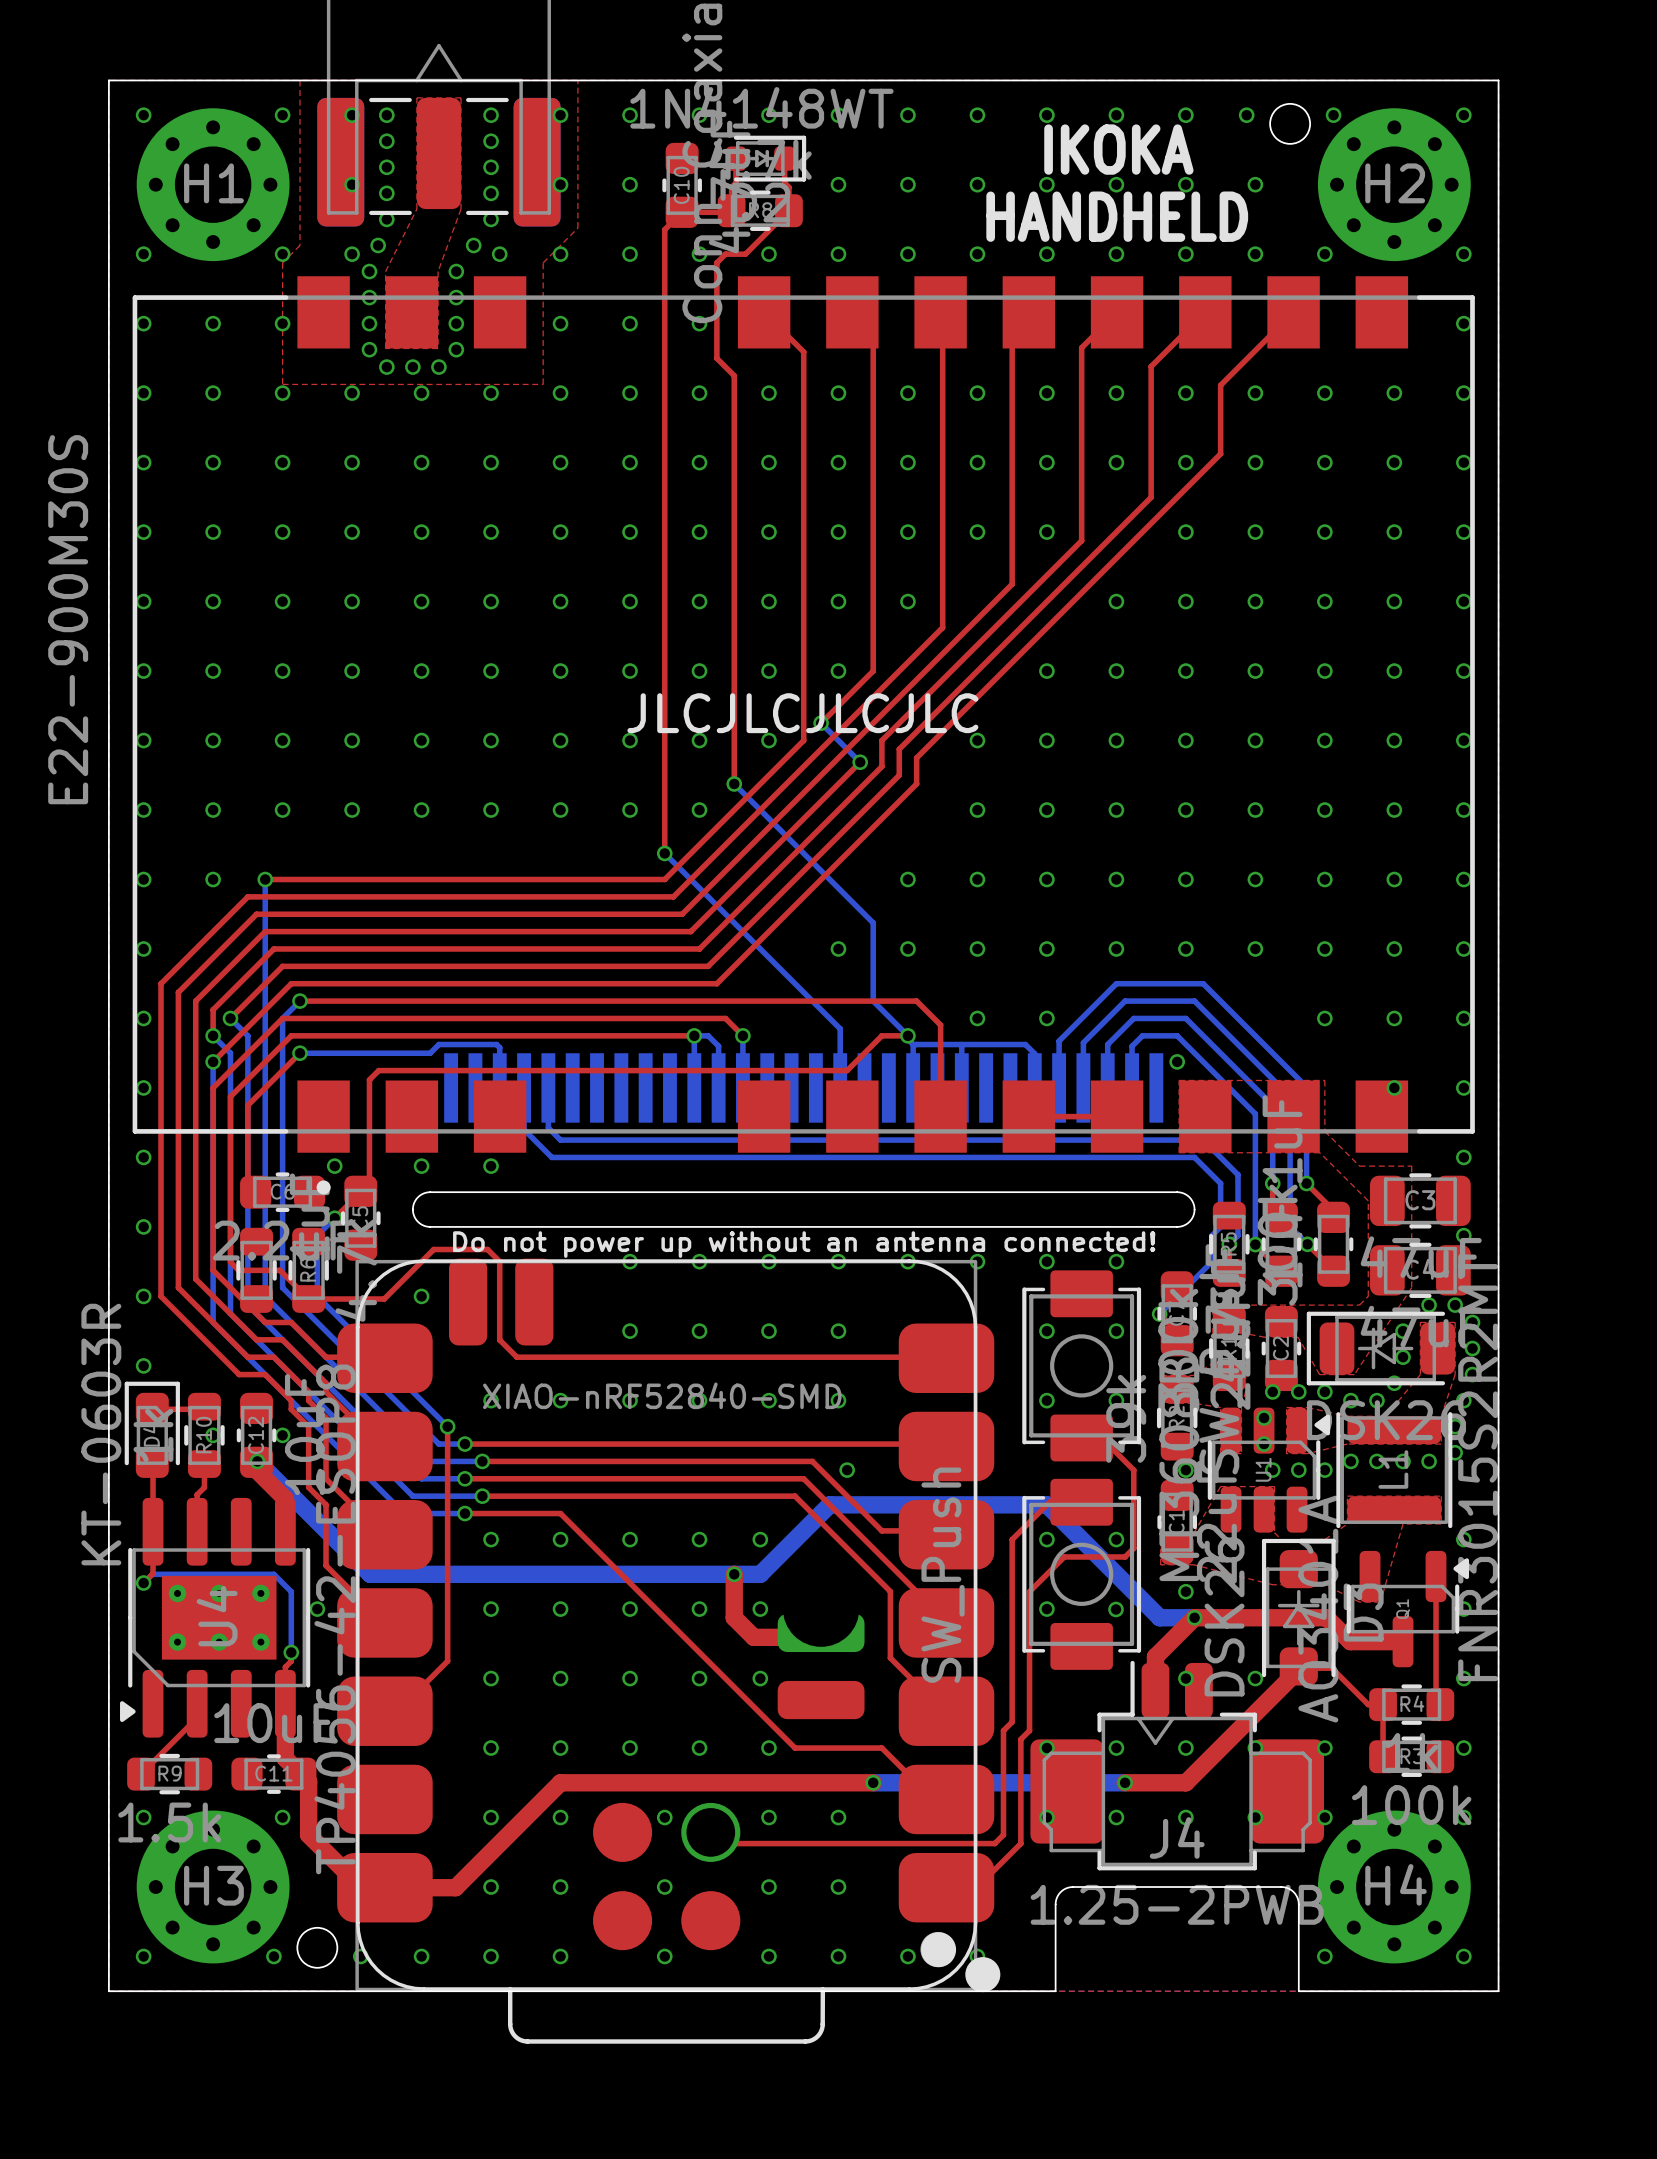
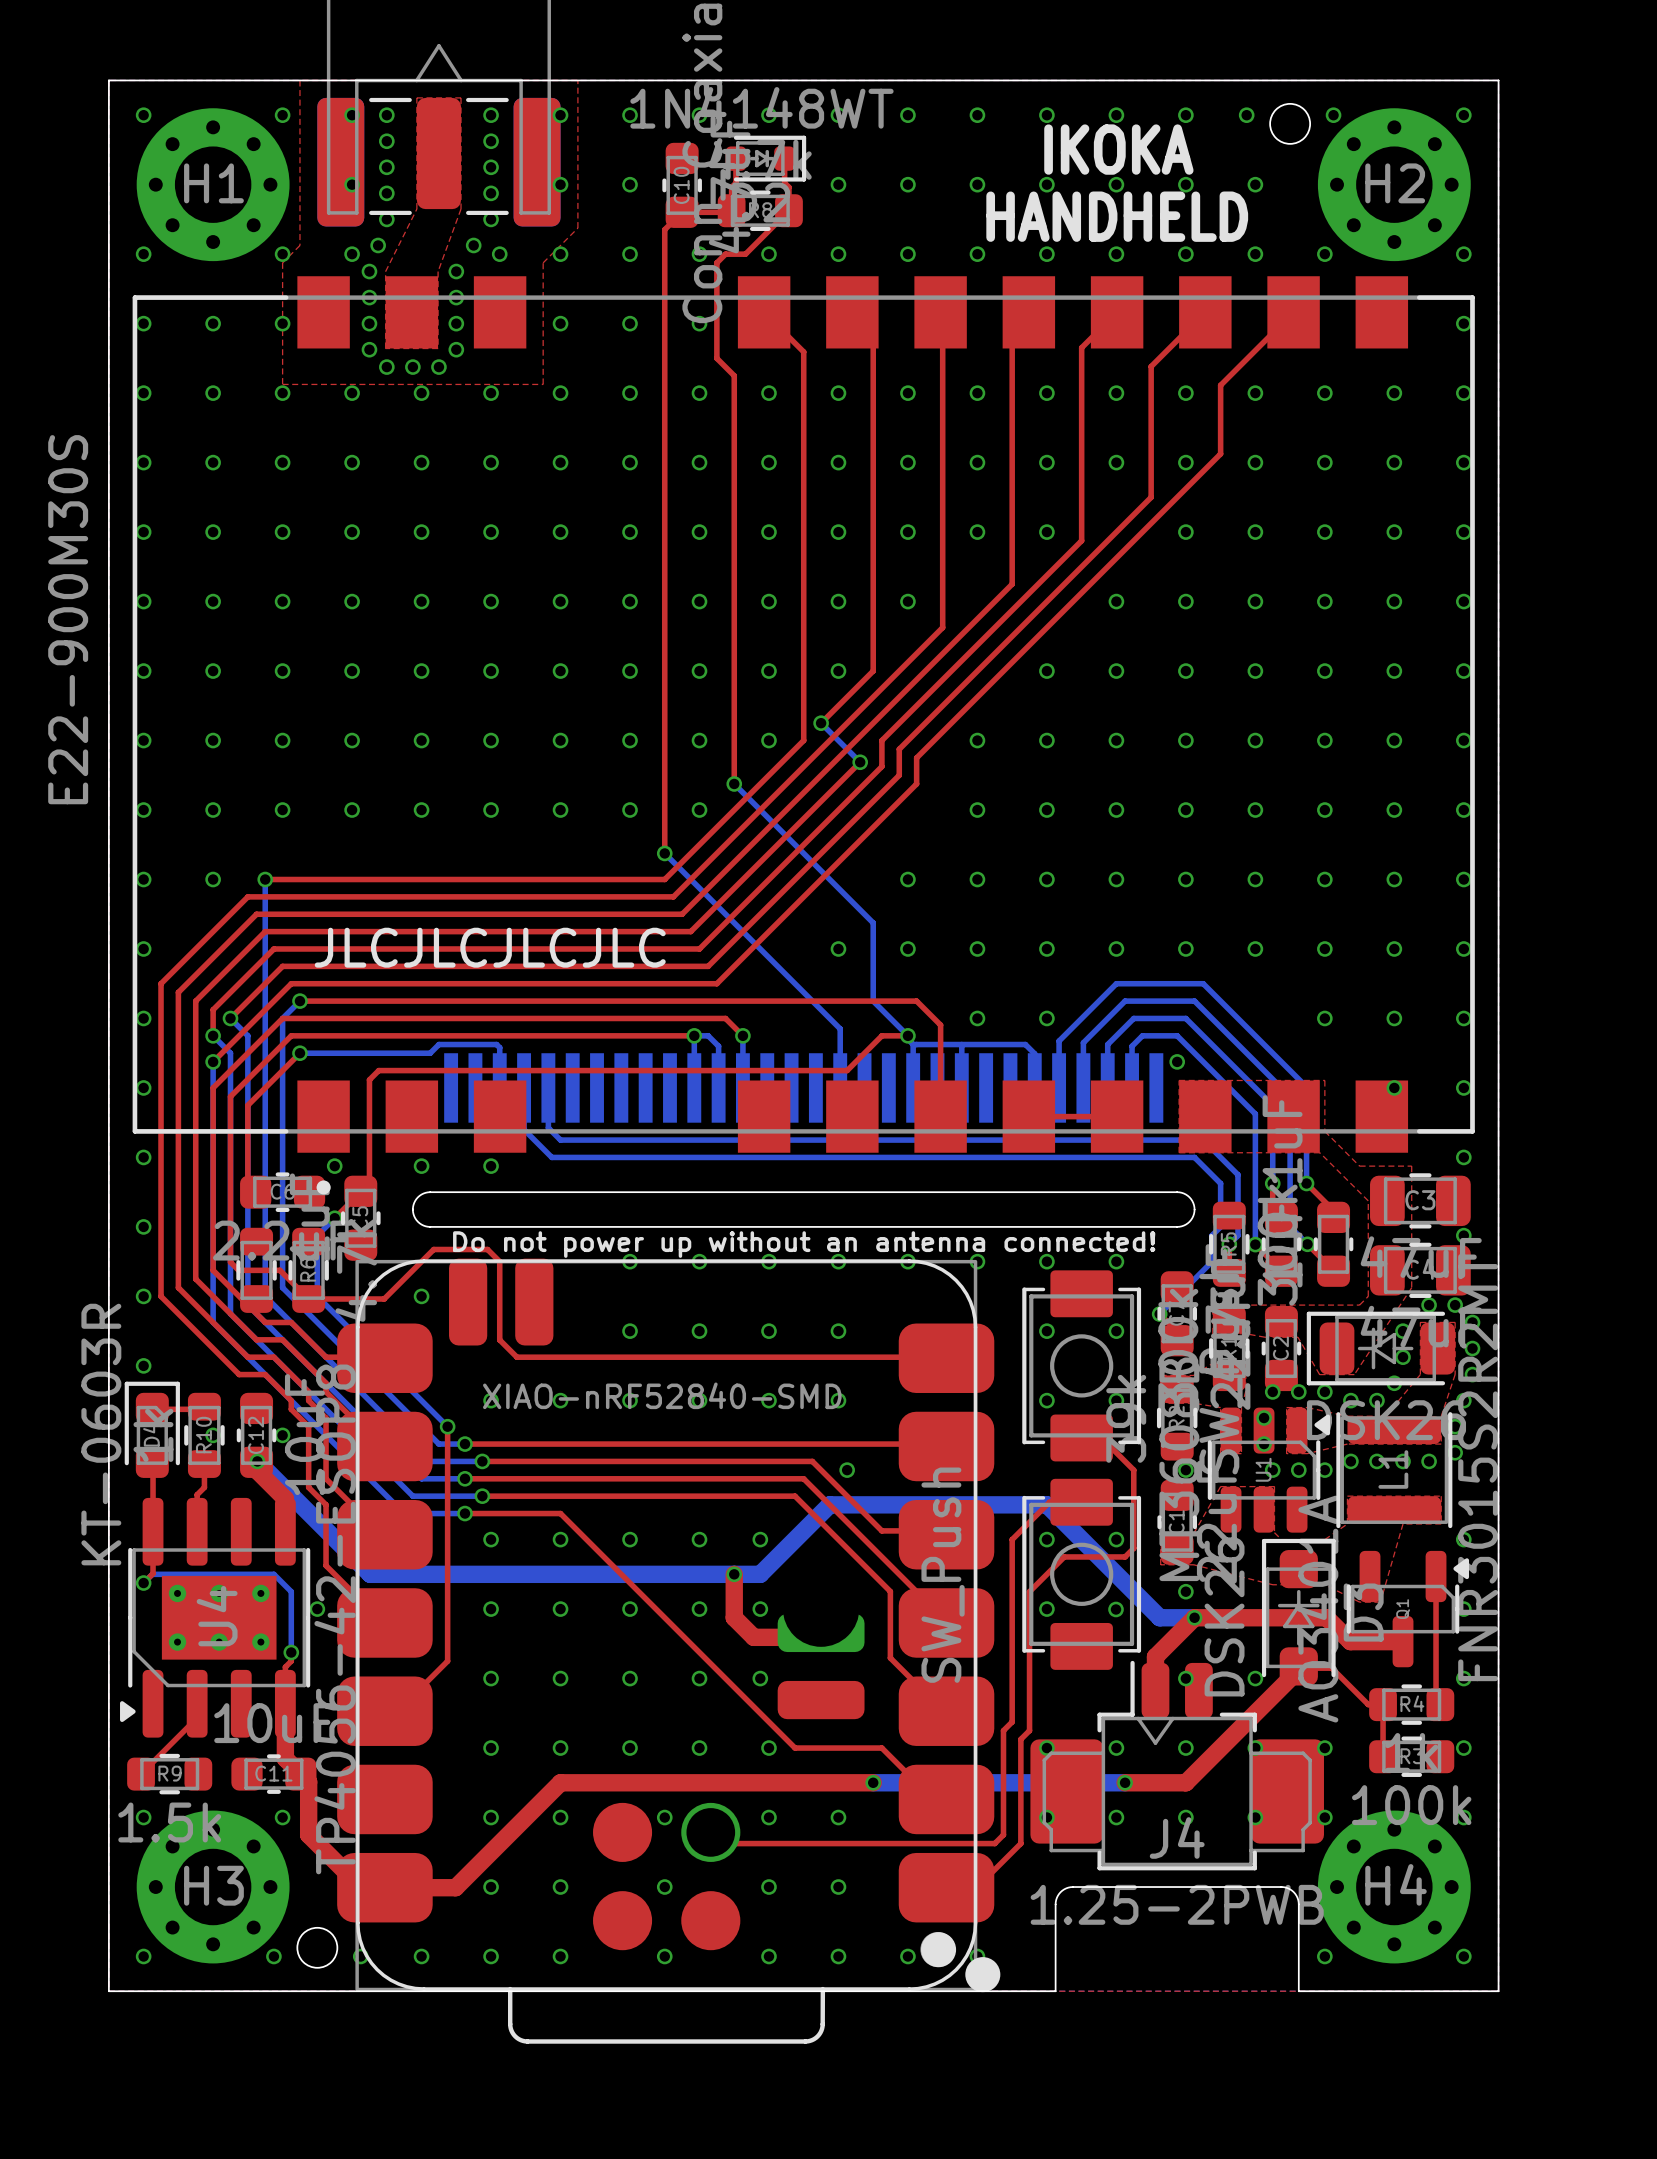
text position: JLCJLCJLCJLC (802, 713) -> JLCJLCJLCJLC (490, 947)

